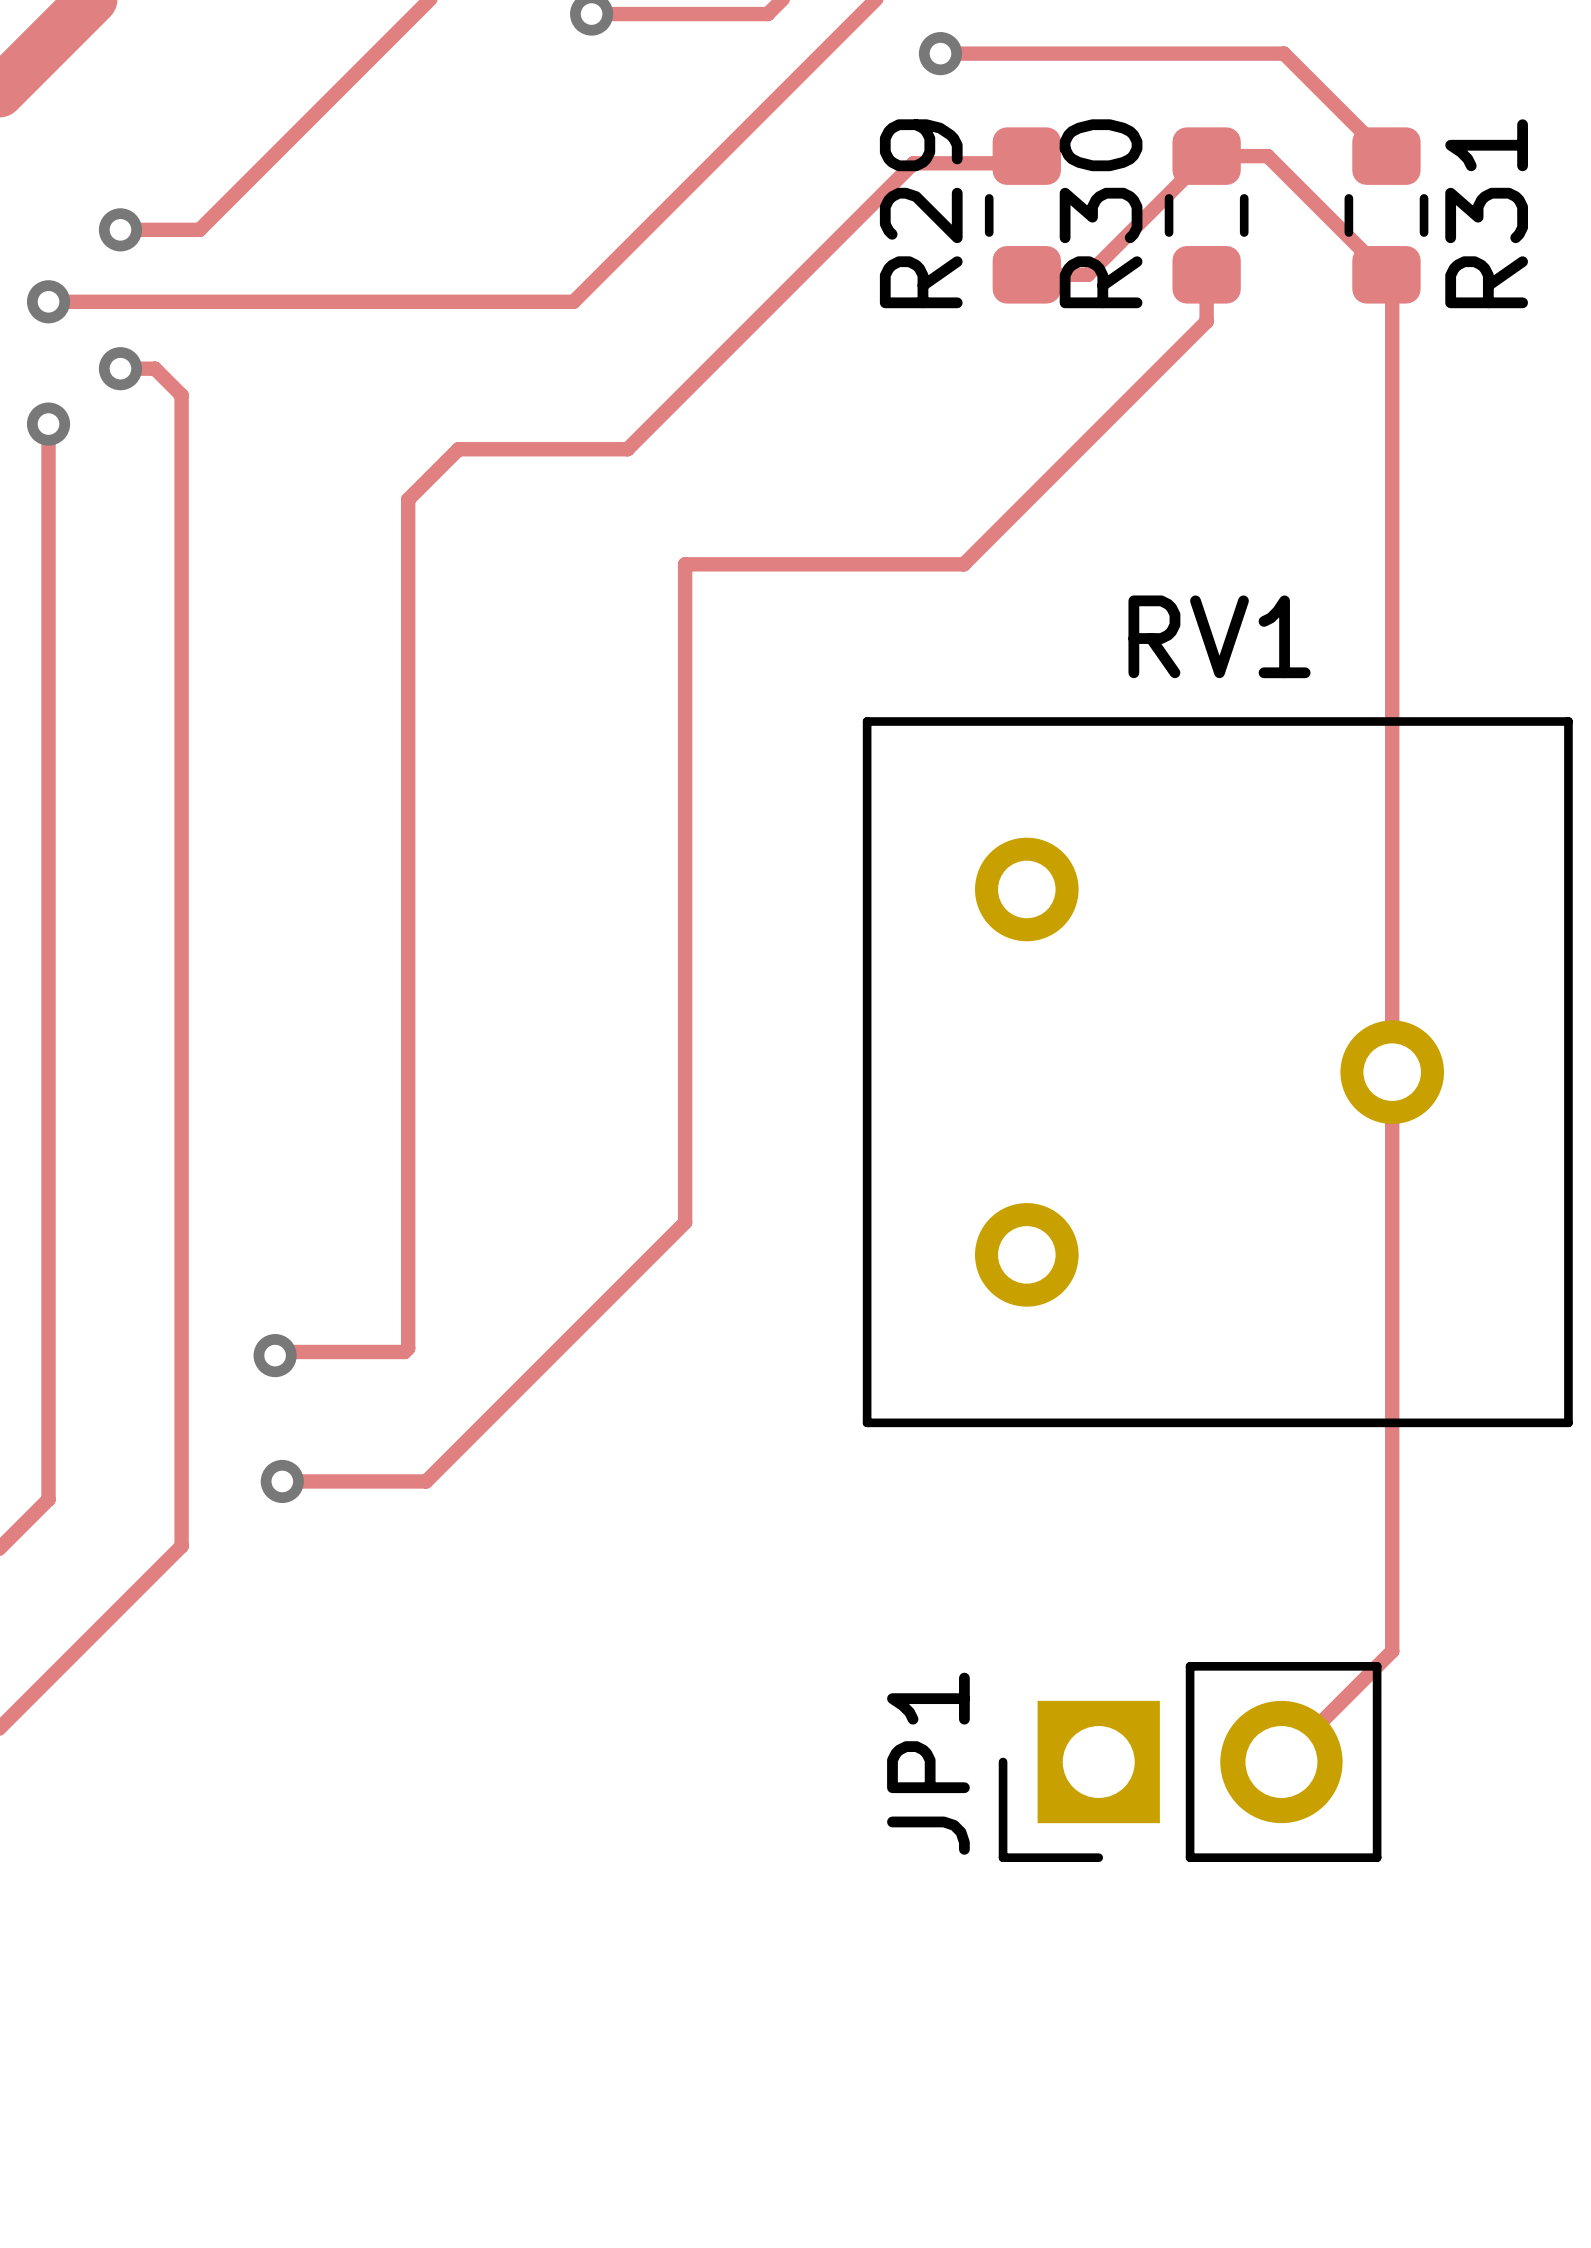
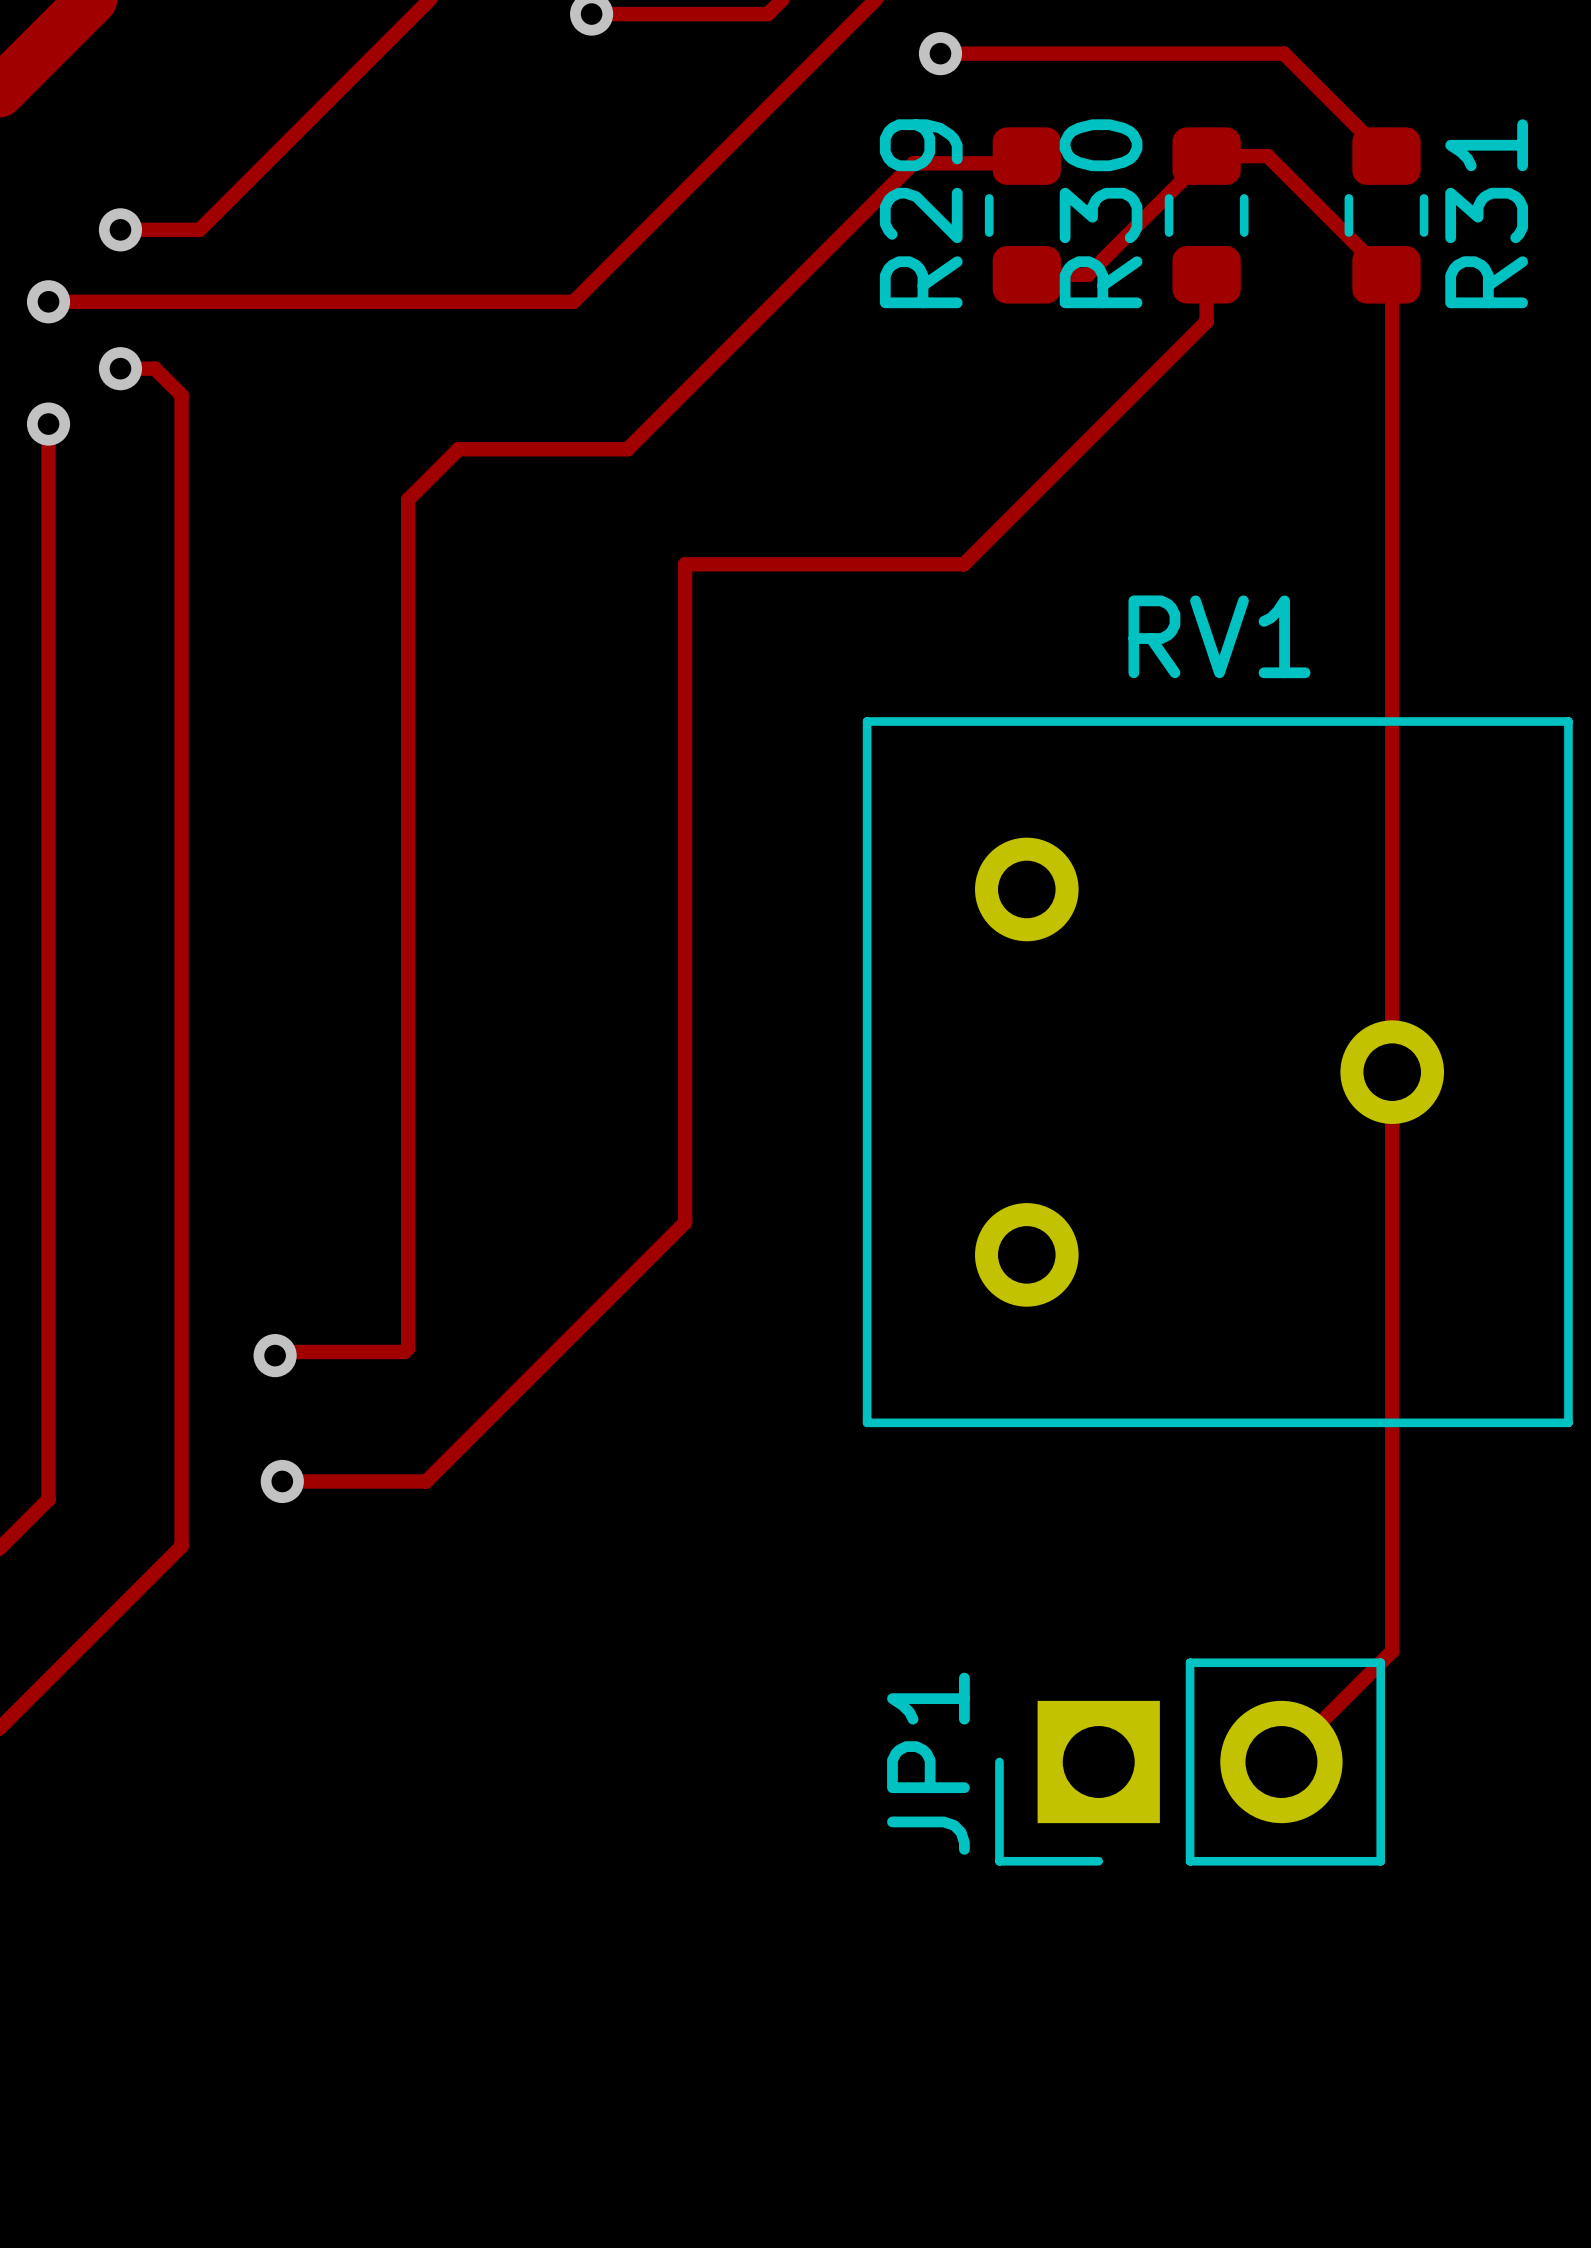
JP1 footprint: [998, 1662, 1382, 1862] -> [995, 1658, 1386, 1866]

